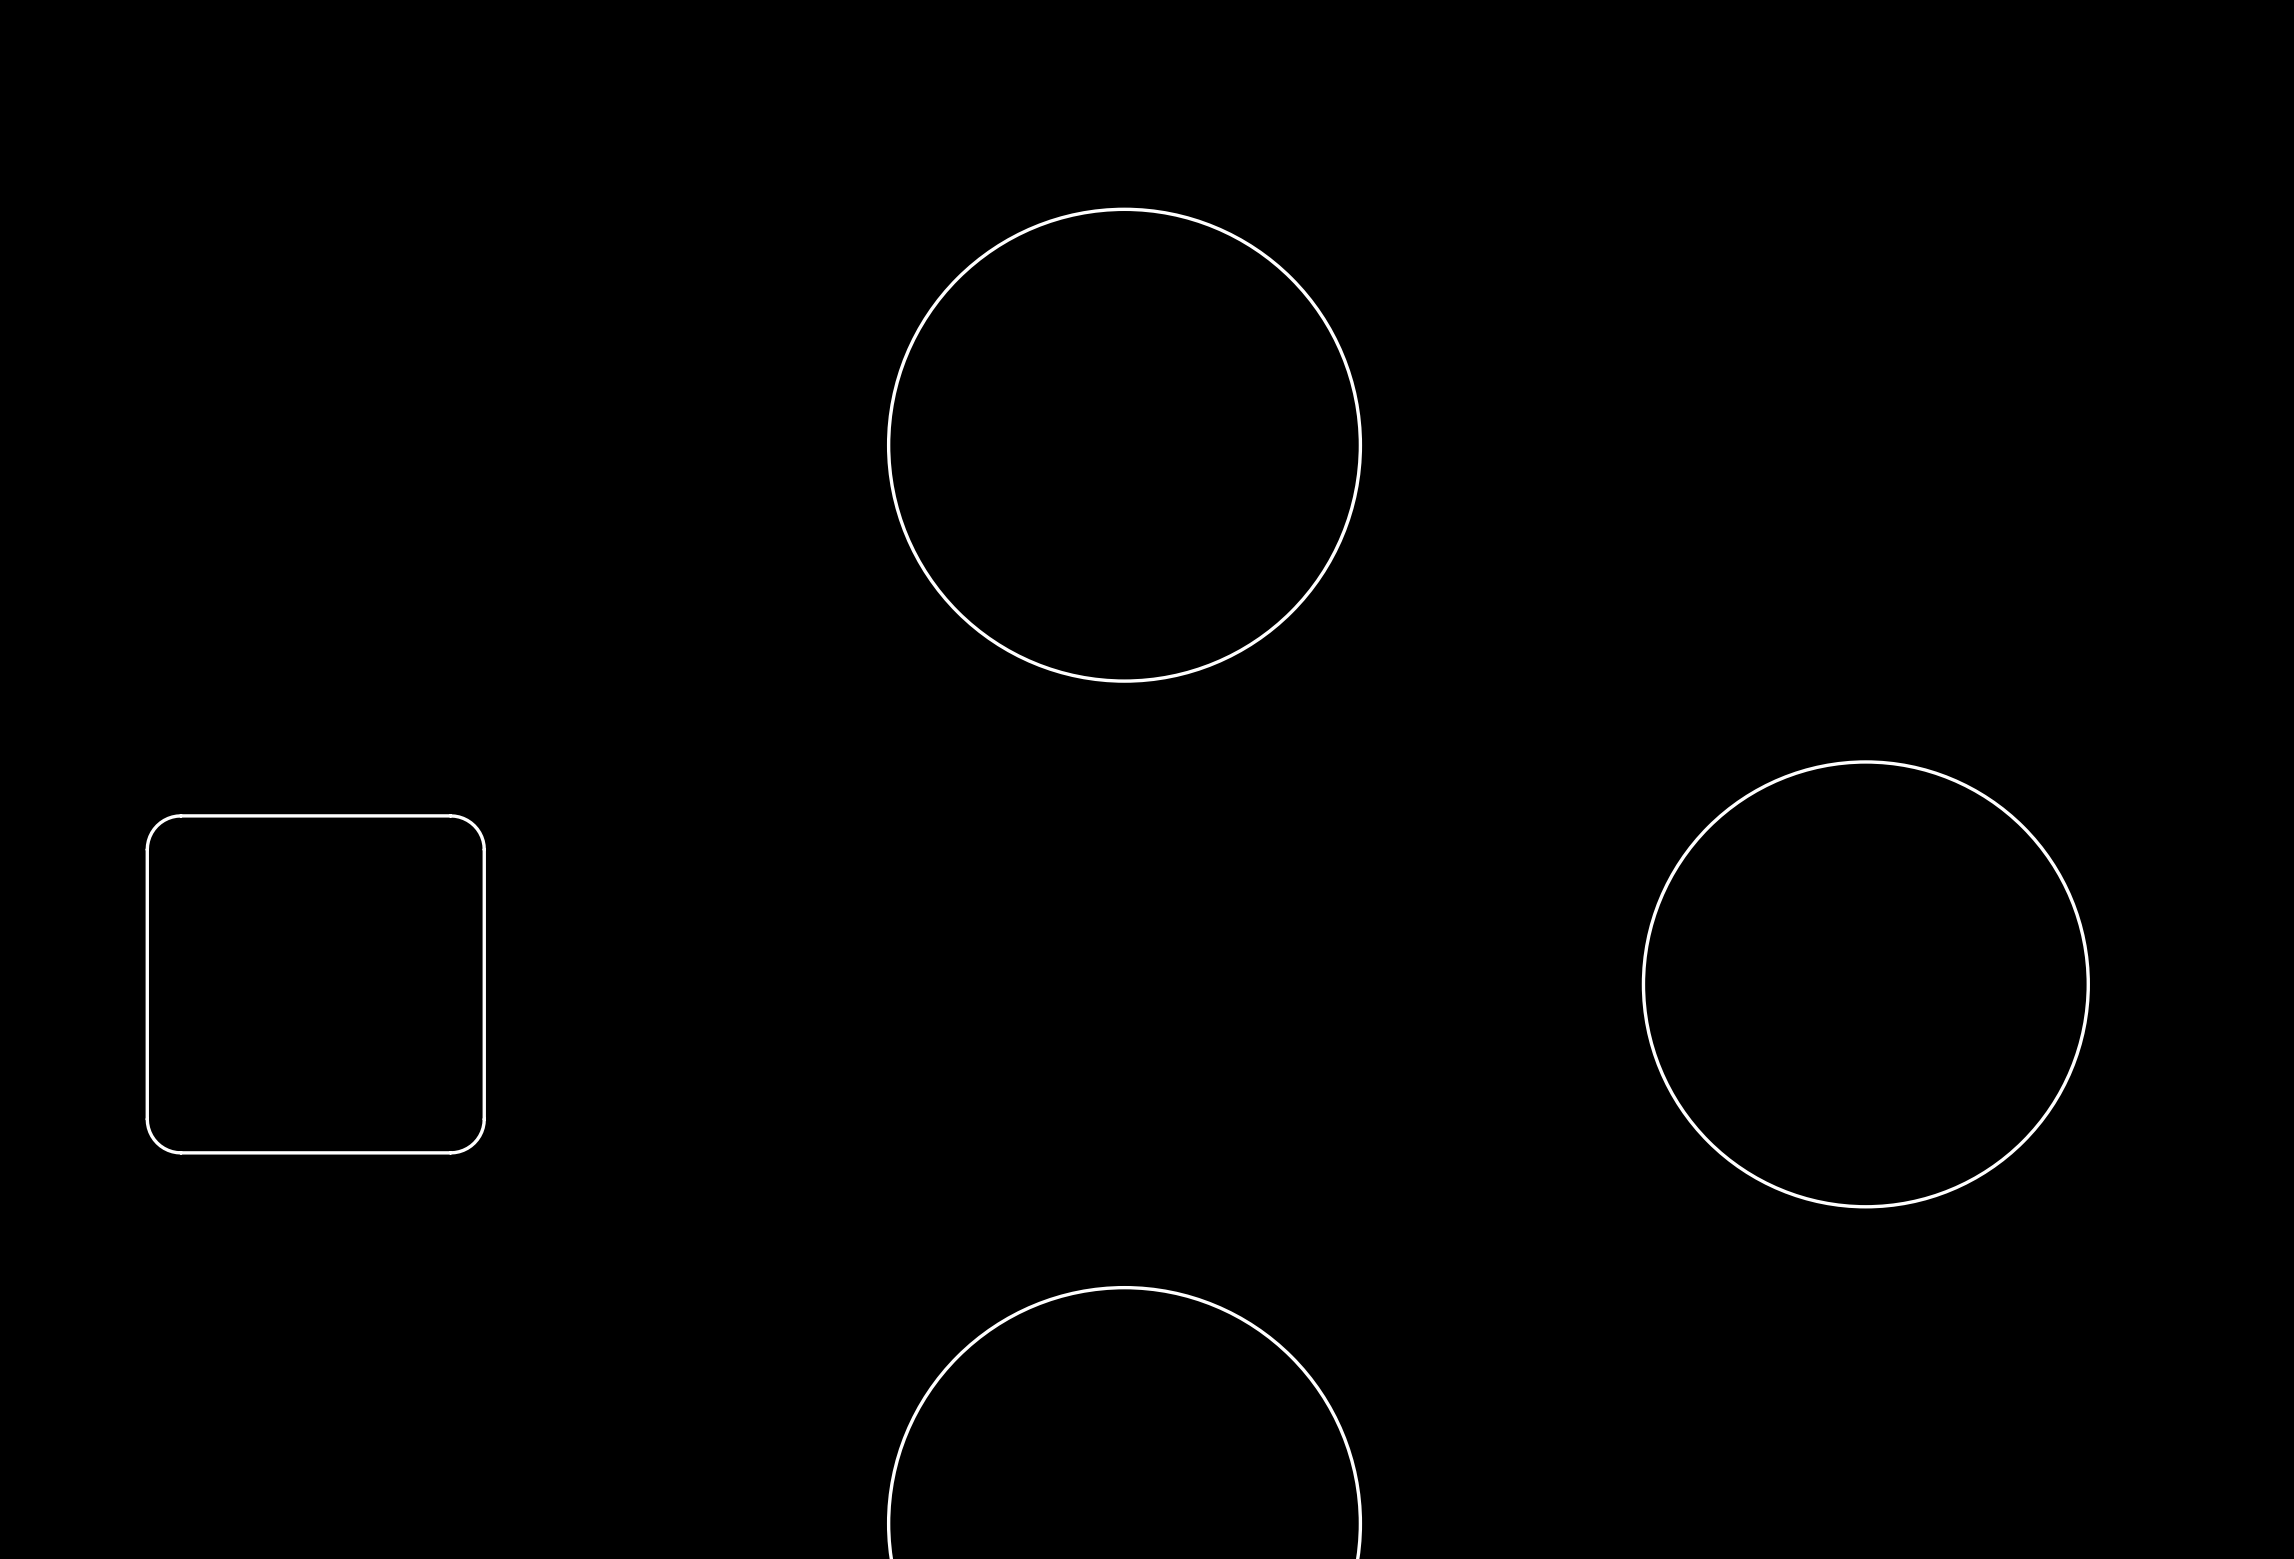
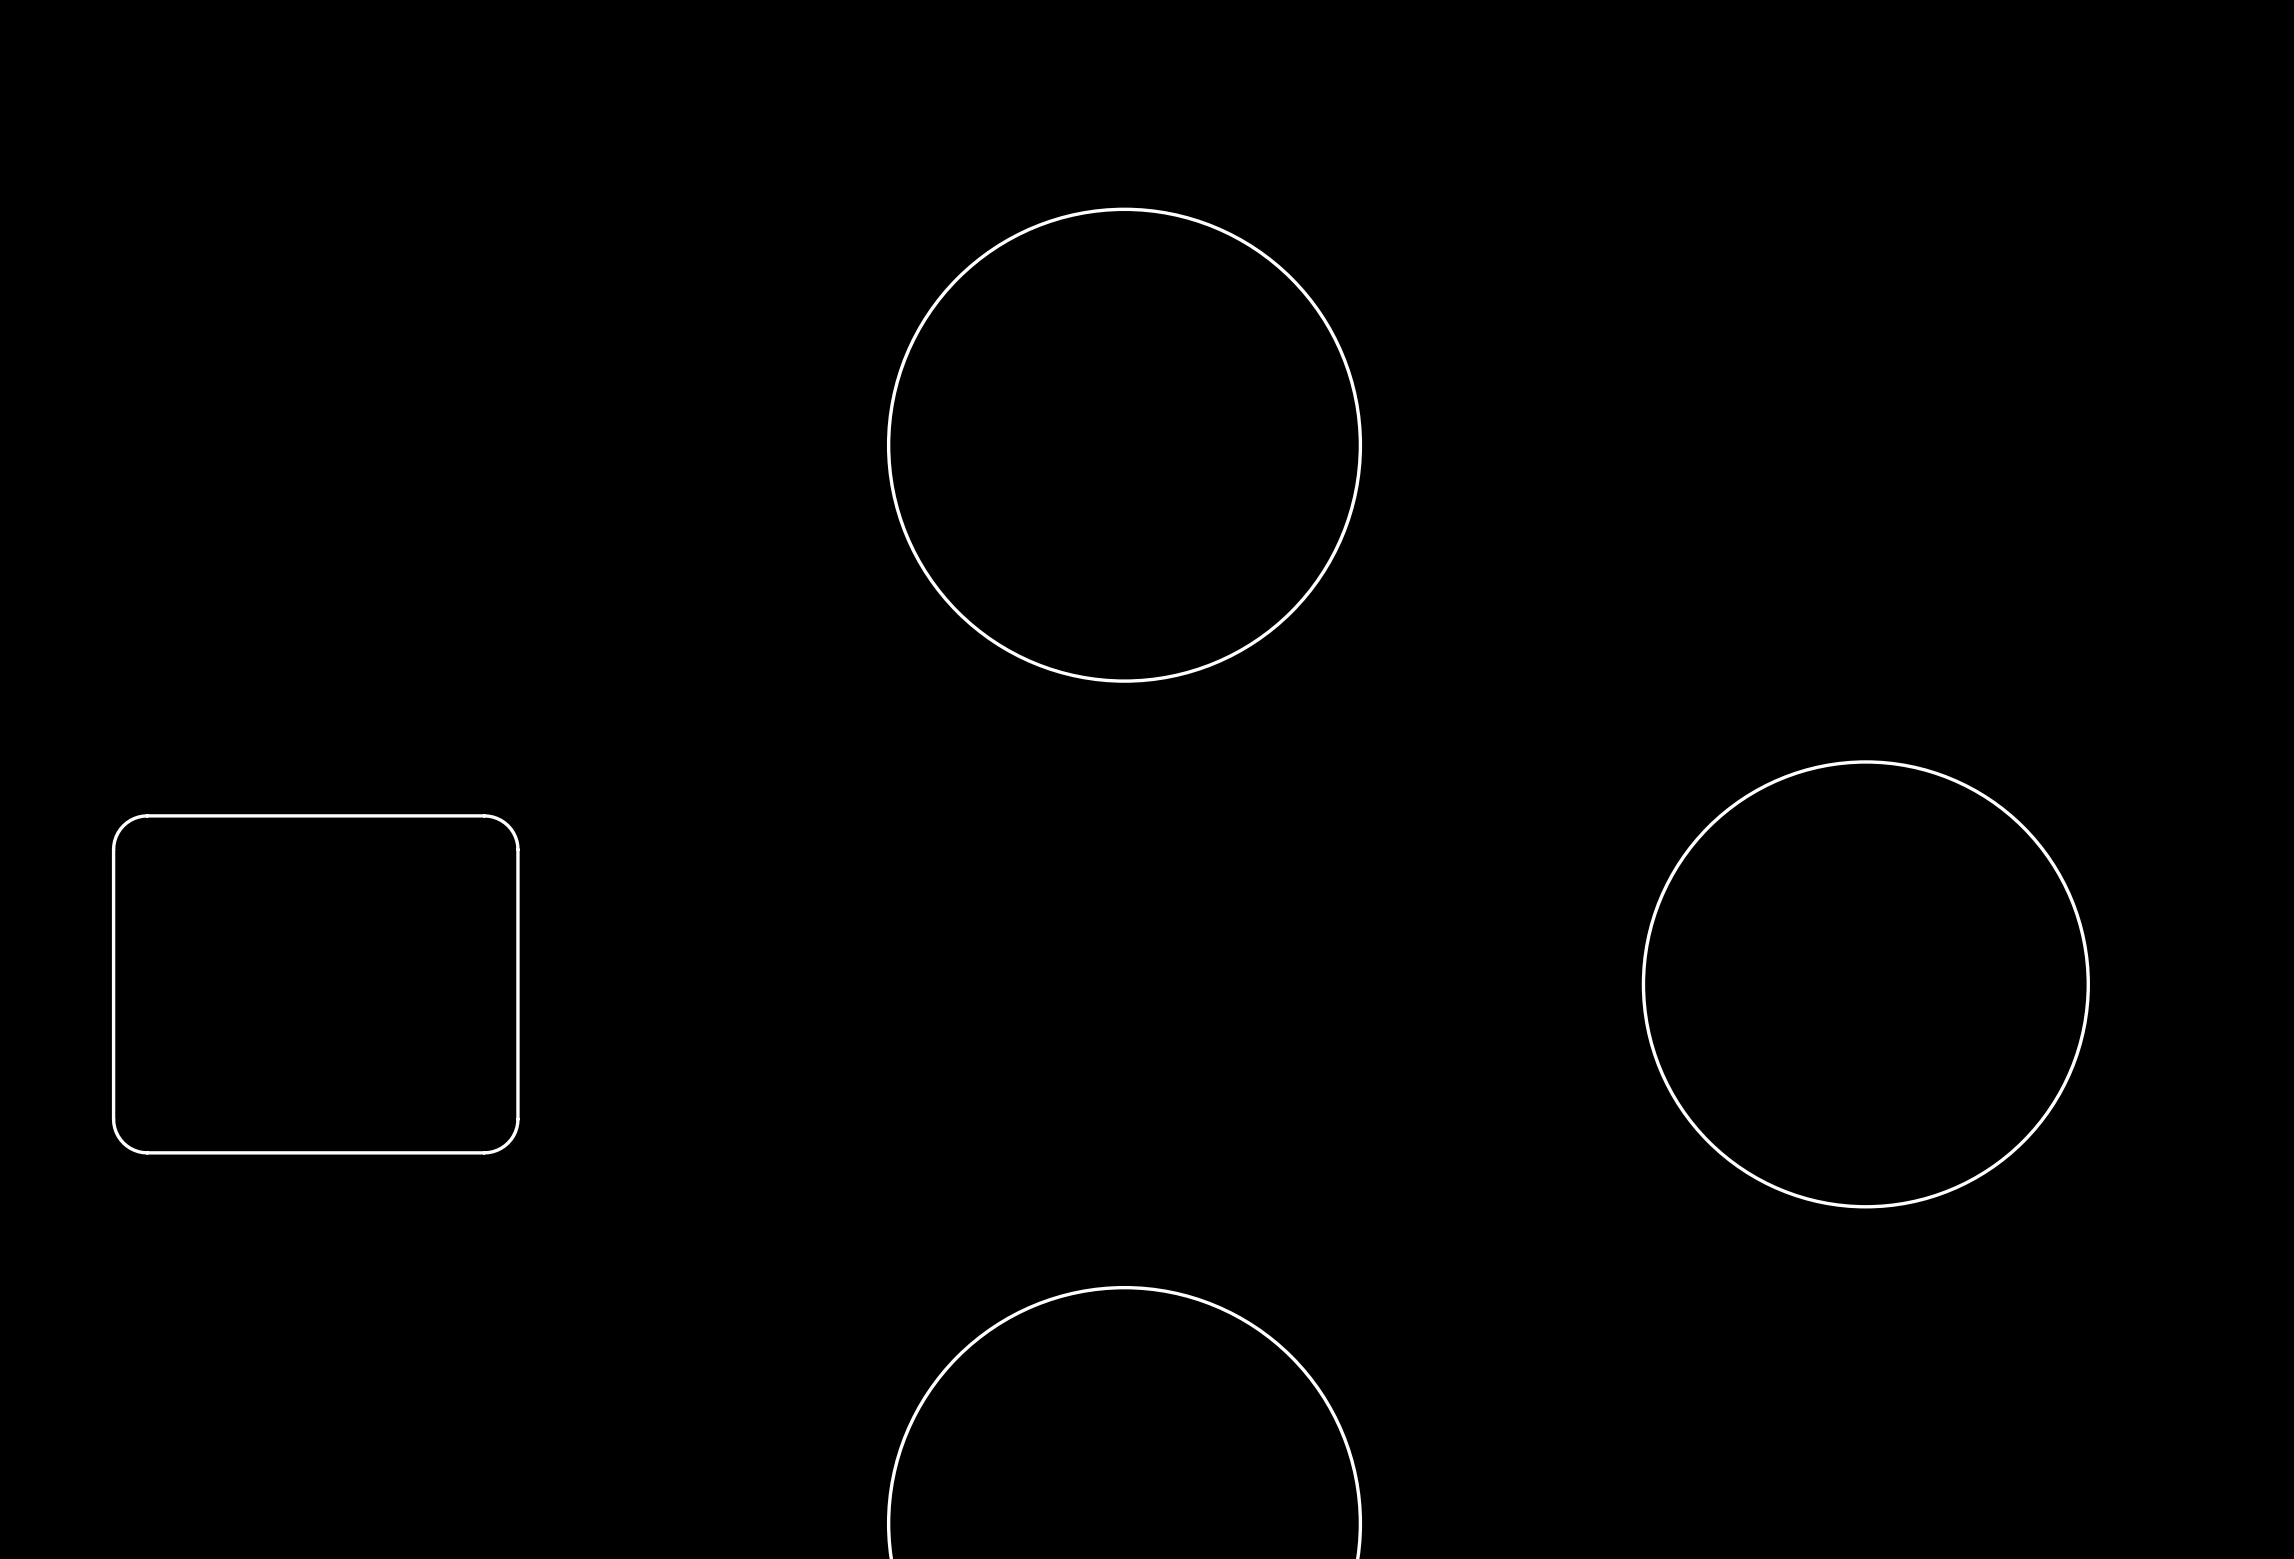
board edge: (180, 815) (168, 818) (157, 825) (149, 836) (147, 849) (147, 1123) (149, 1132) (157, 1142) (168, 1150) (180, 1152) -> (180, 815) (142, 816) (130, 820) (118, 832) (113, 849) (114, 1127) (120, 1139) (134, 1150) (147, 1152) (180, 1152)
board edge: (450, 815) (463, 818) (474, 825) (481, 836) (484, 849) (483, 1123) (479, 1136) (474, 1142) (463, 1150) (450, 1152) -> (450, 815) (488, 816) (501, 820) (513, 832) (517, 849) (516, 1127) (508, 1142) (497, 1150) (484, 1152) (450, 1152)

